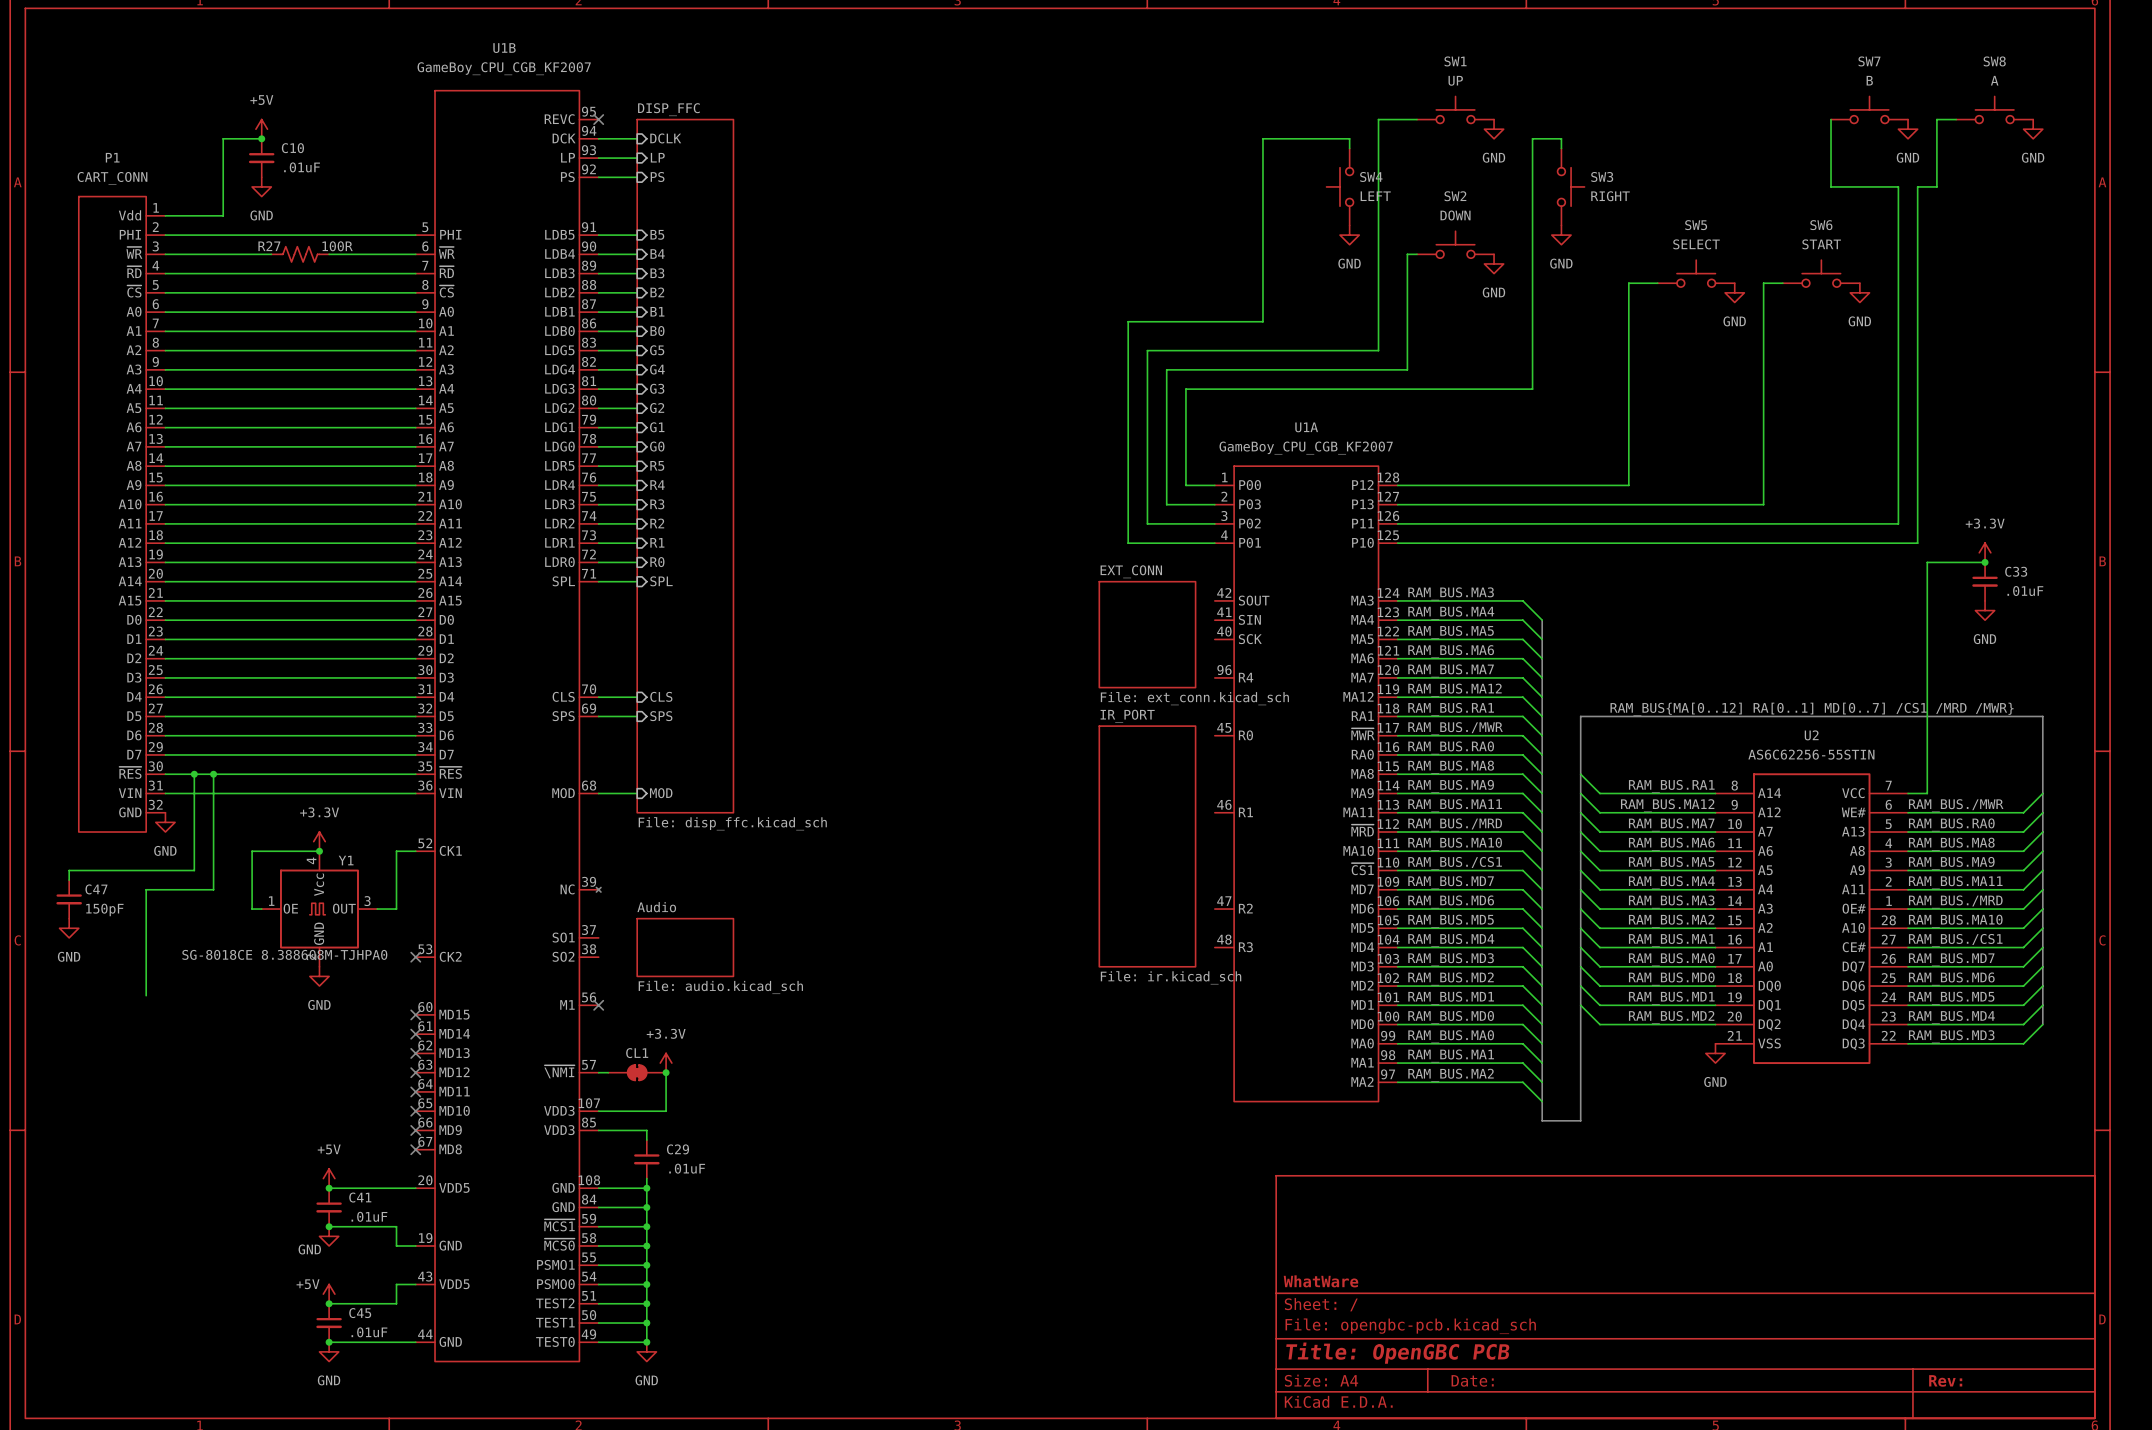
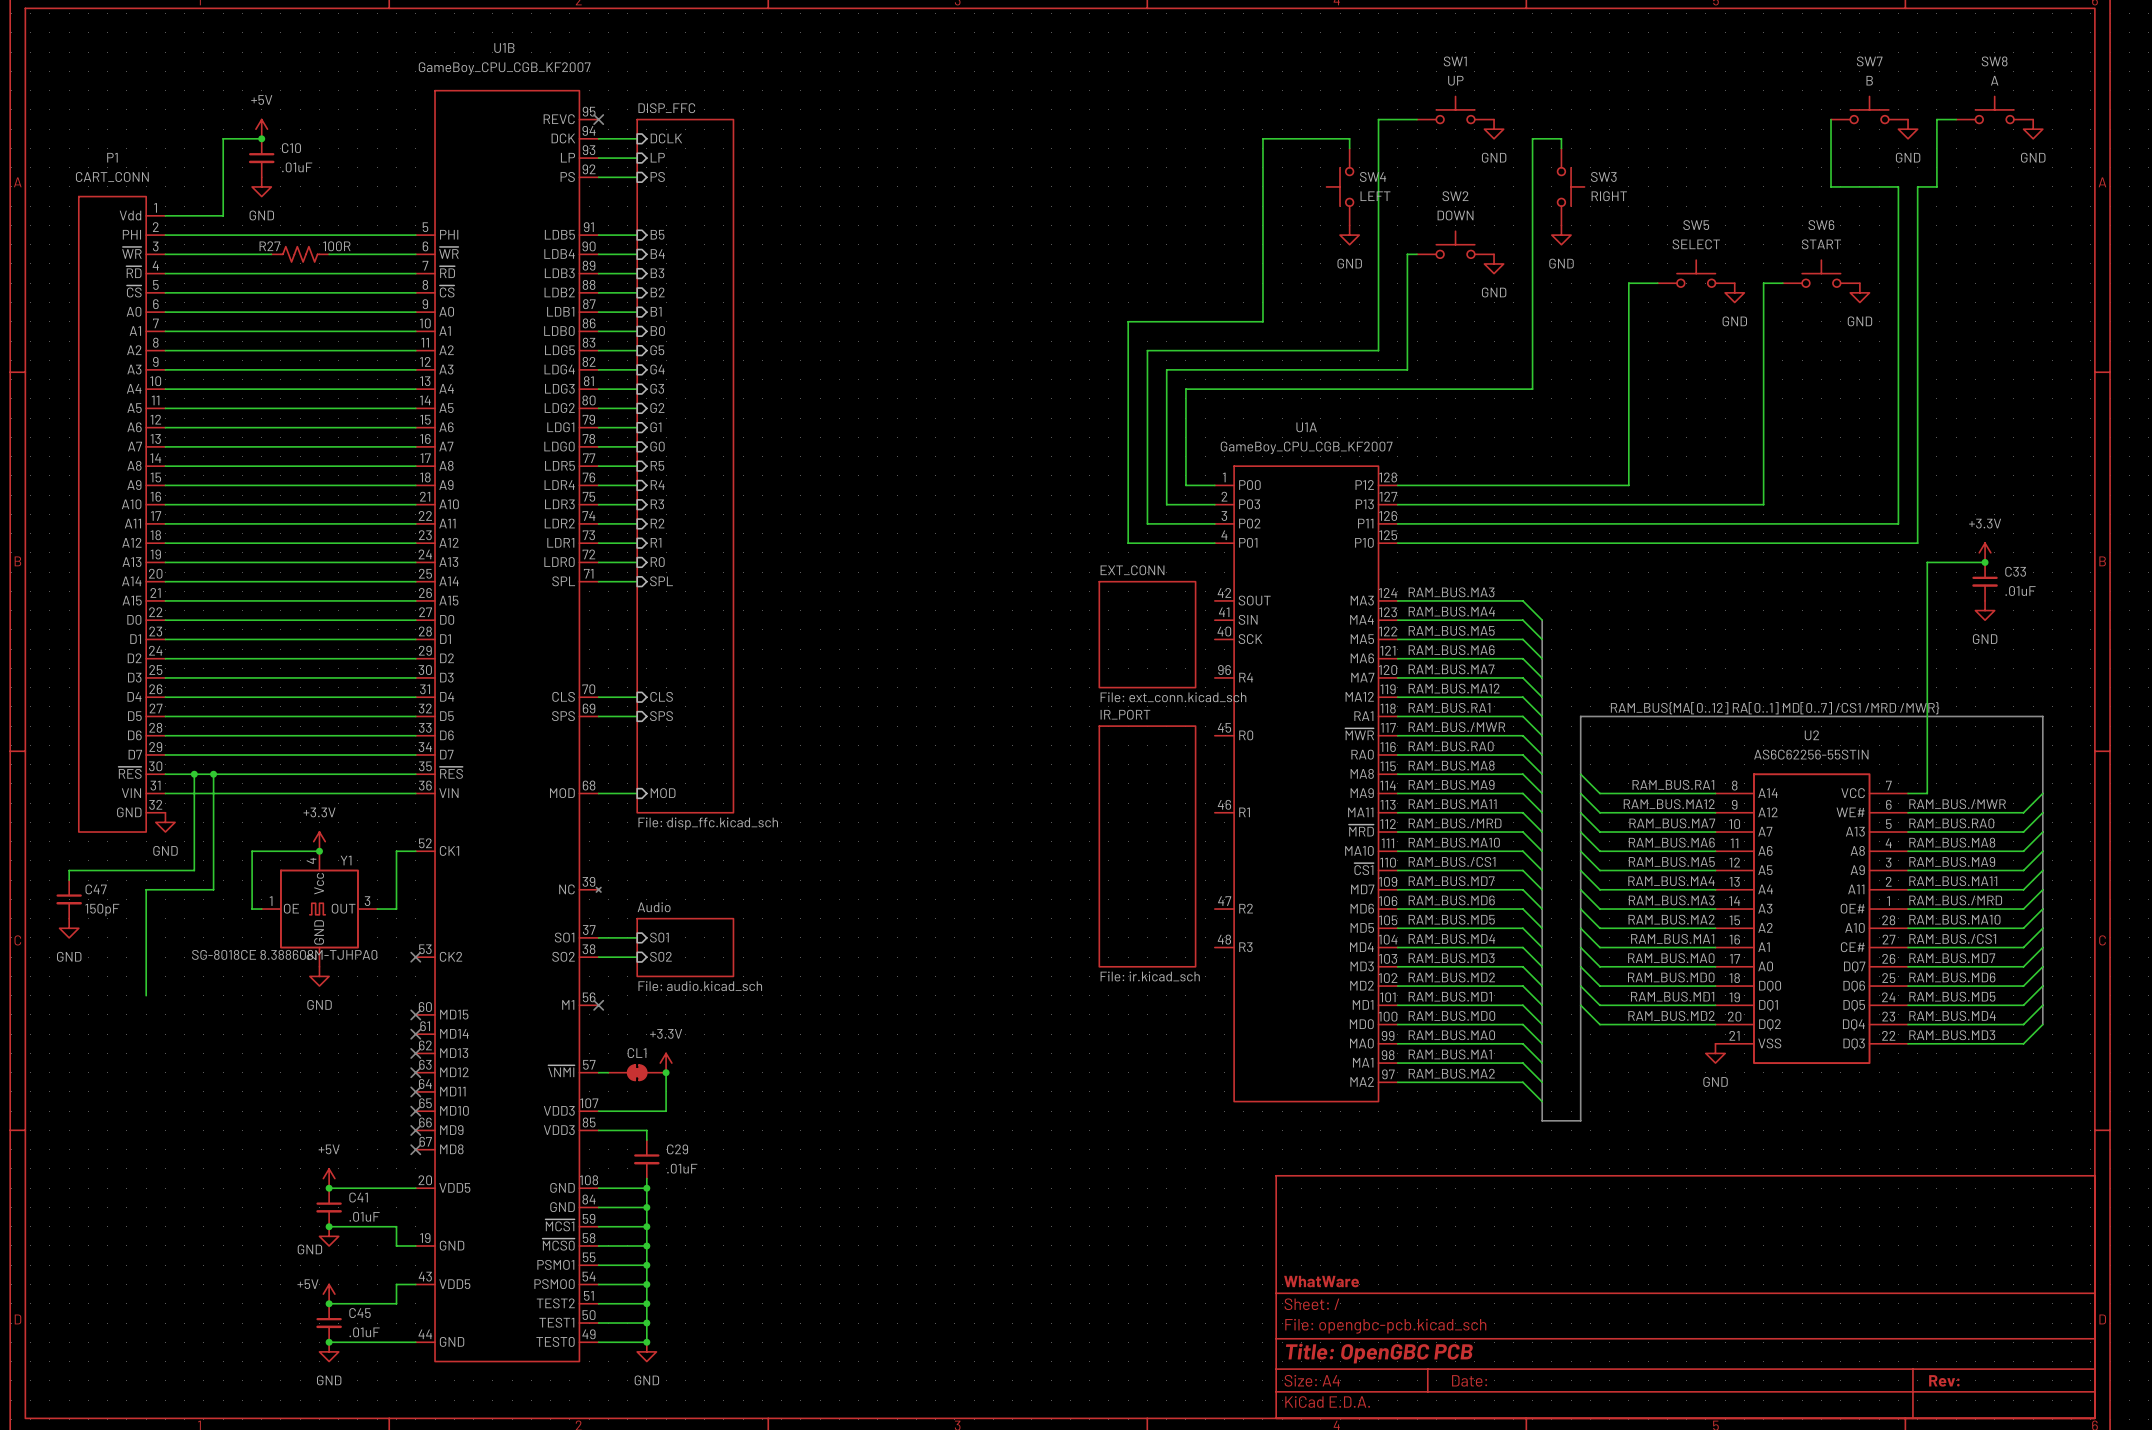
wire: none -> (598, 937) (637, 937)
sheet pin: none -> S01 (659, 937)
sheet pin: none -> S02 (660, 956)
wire: none -> (598, 957) (637, 957)

